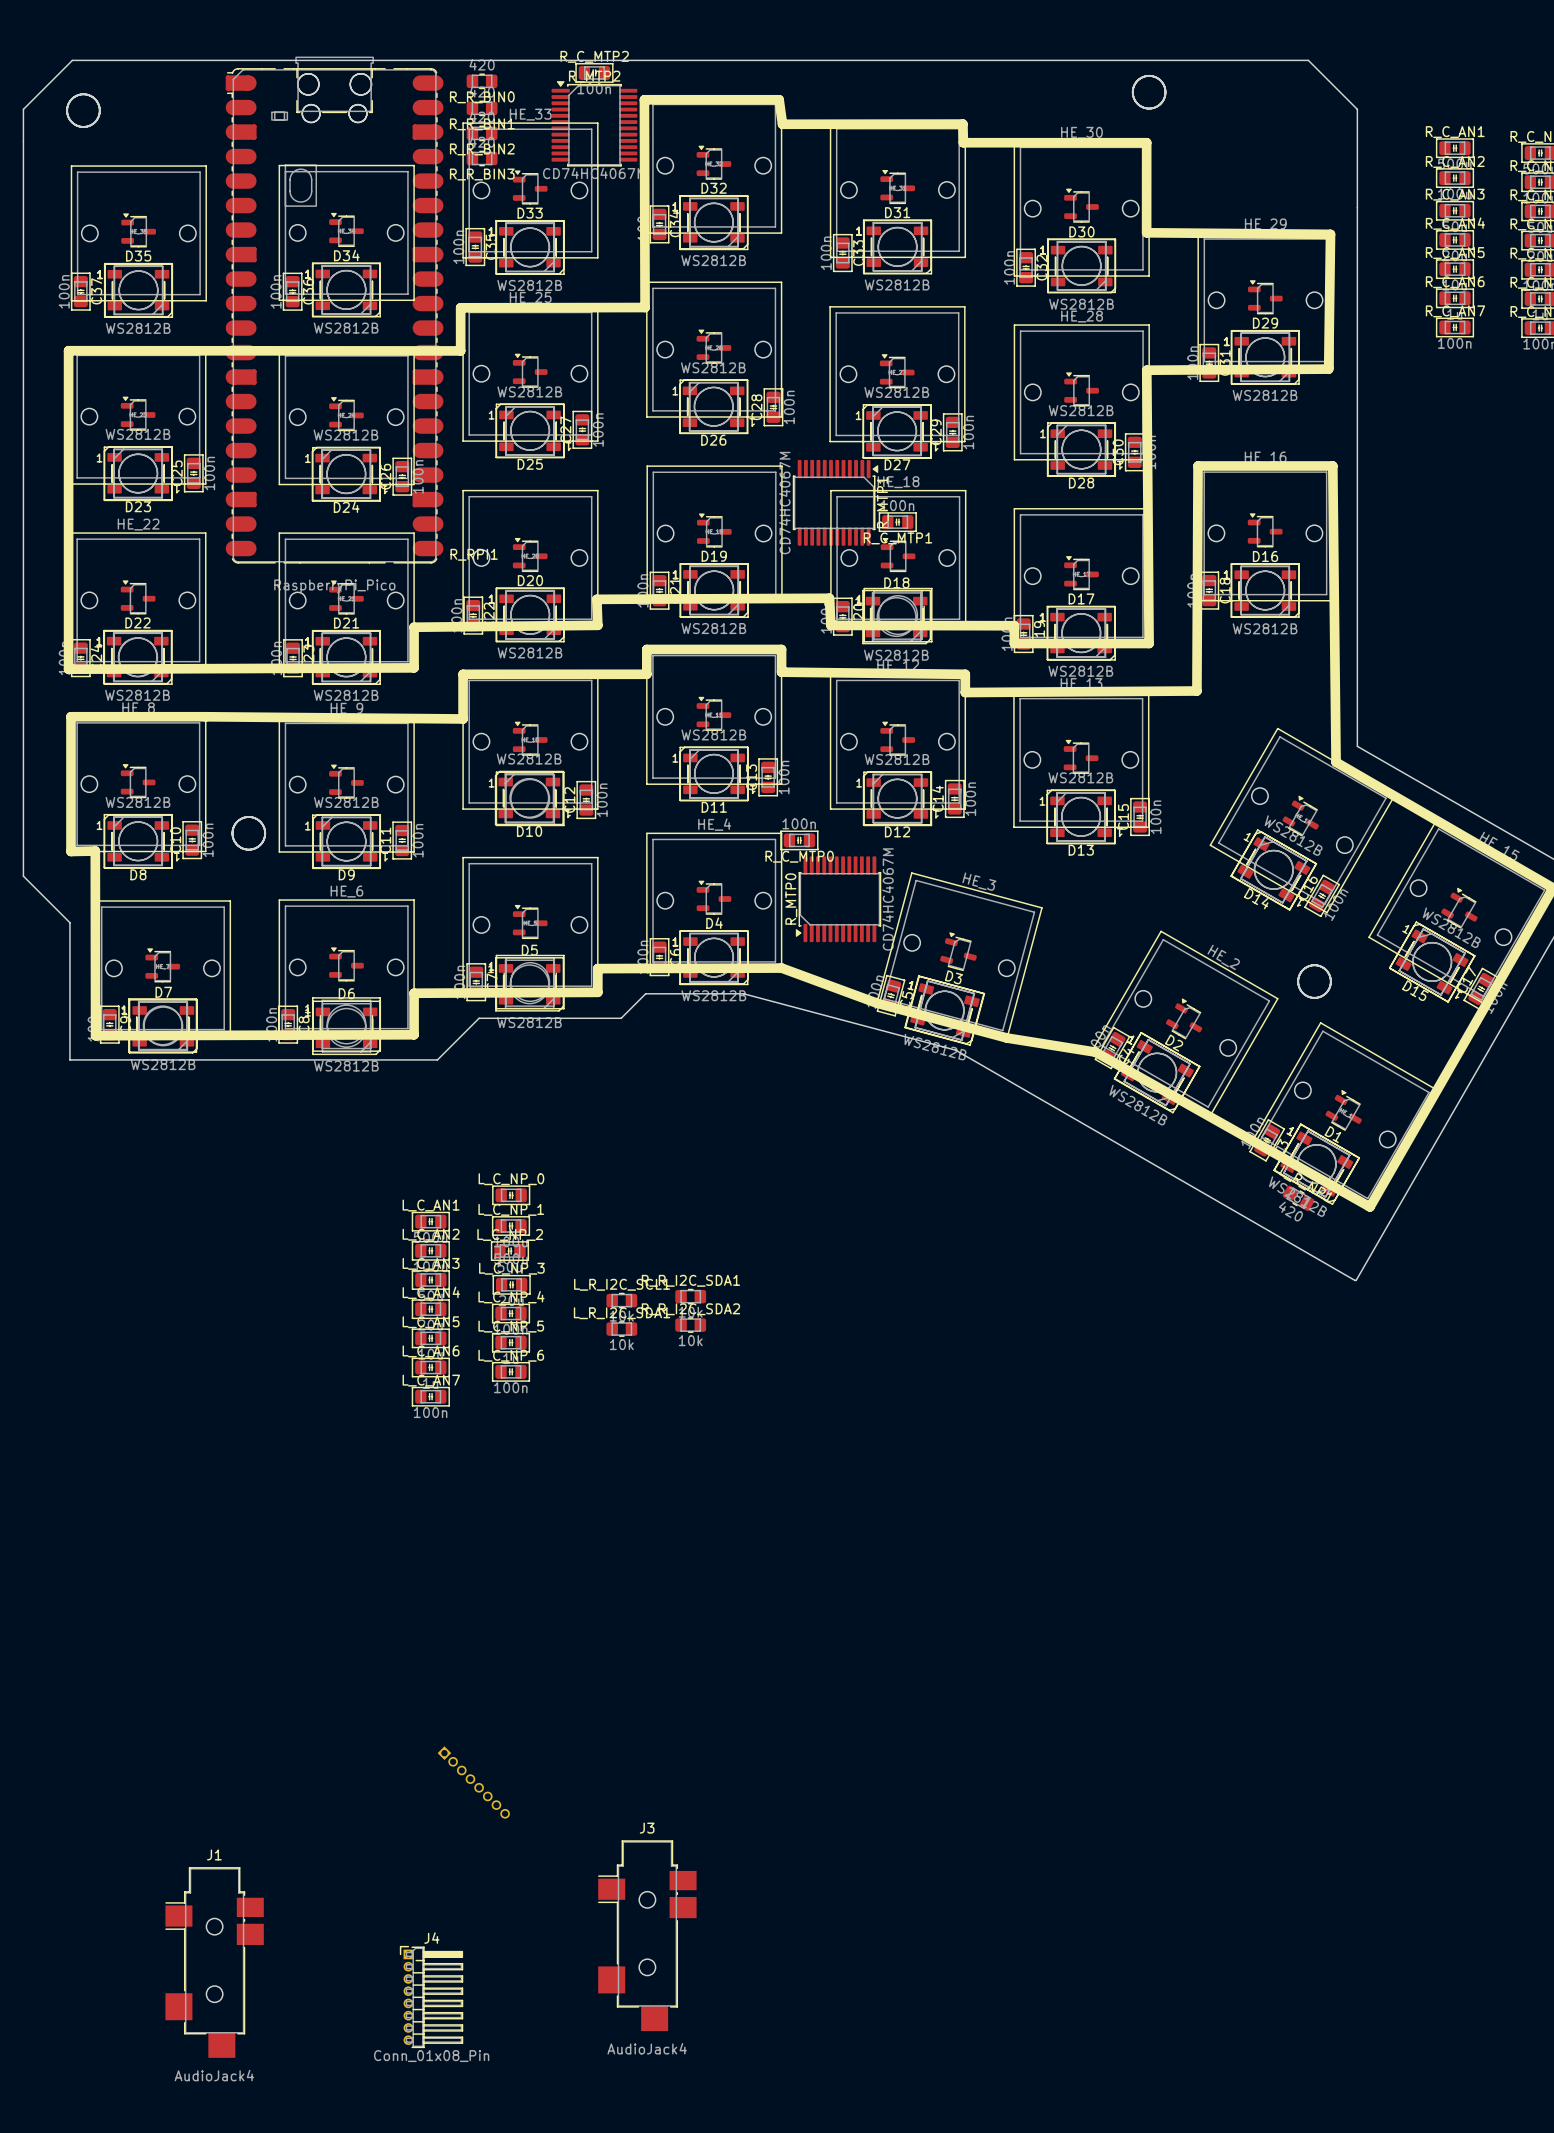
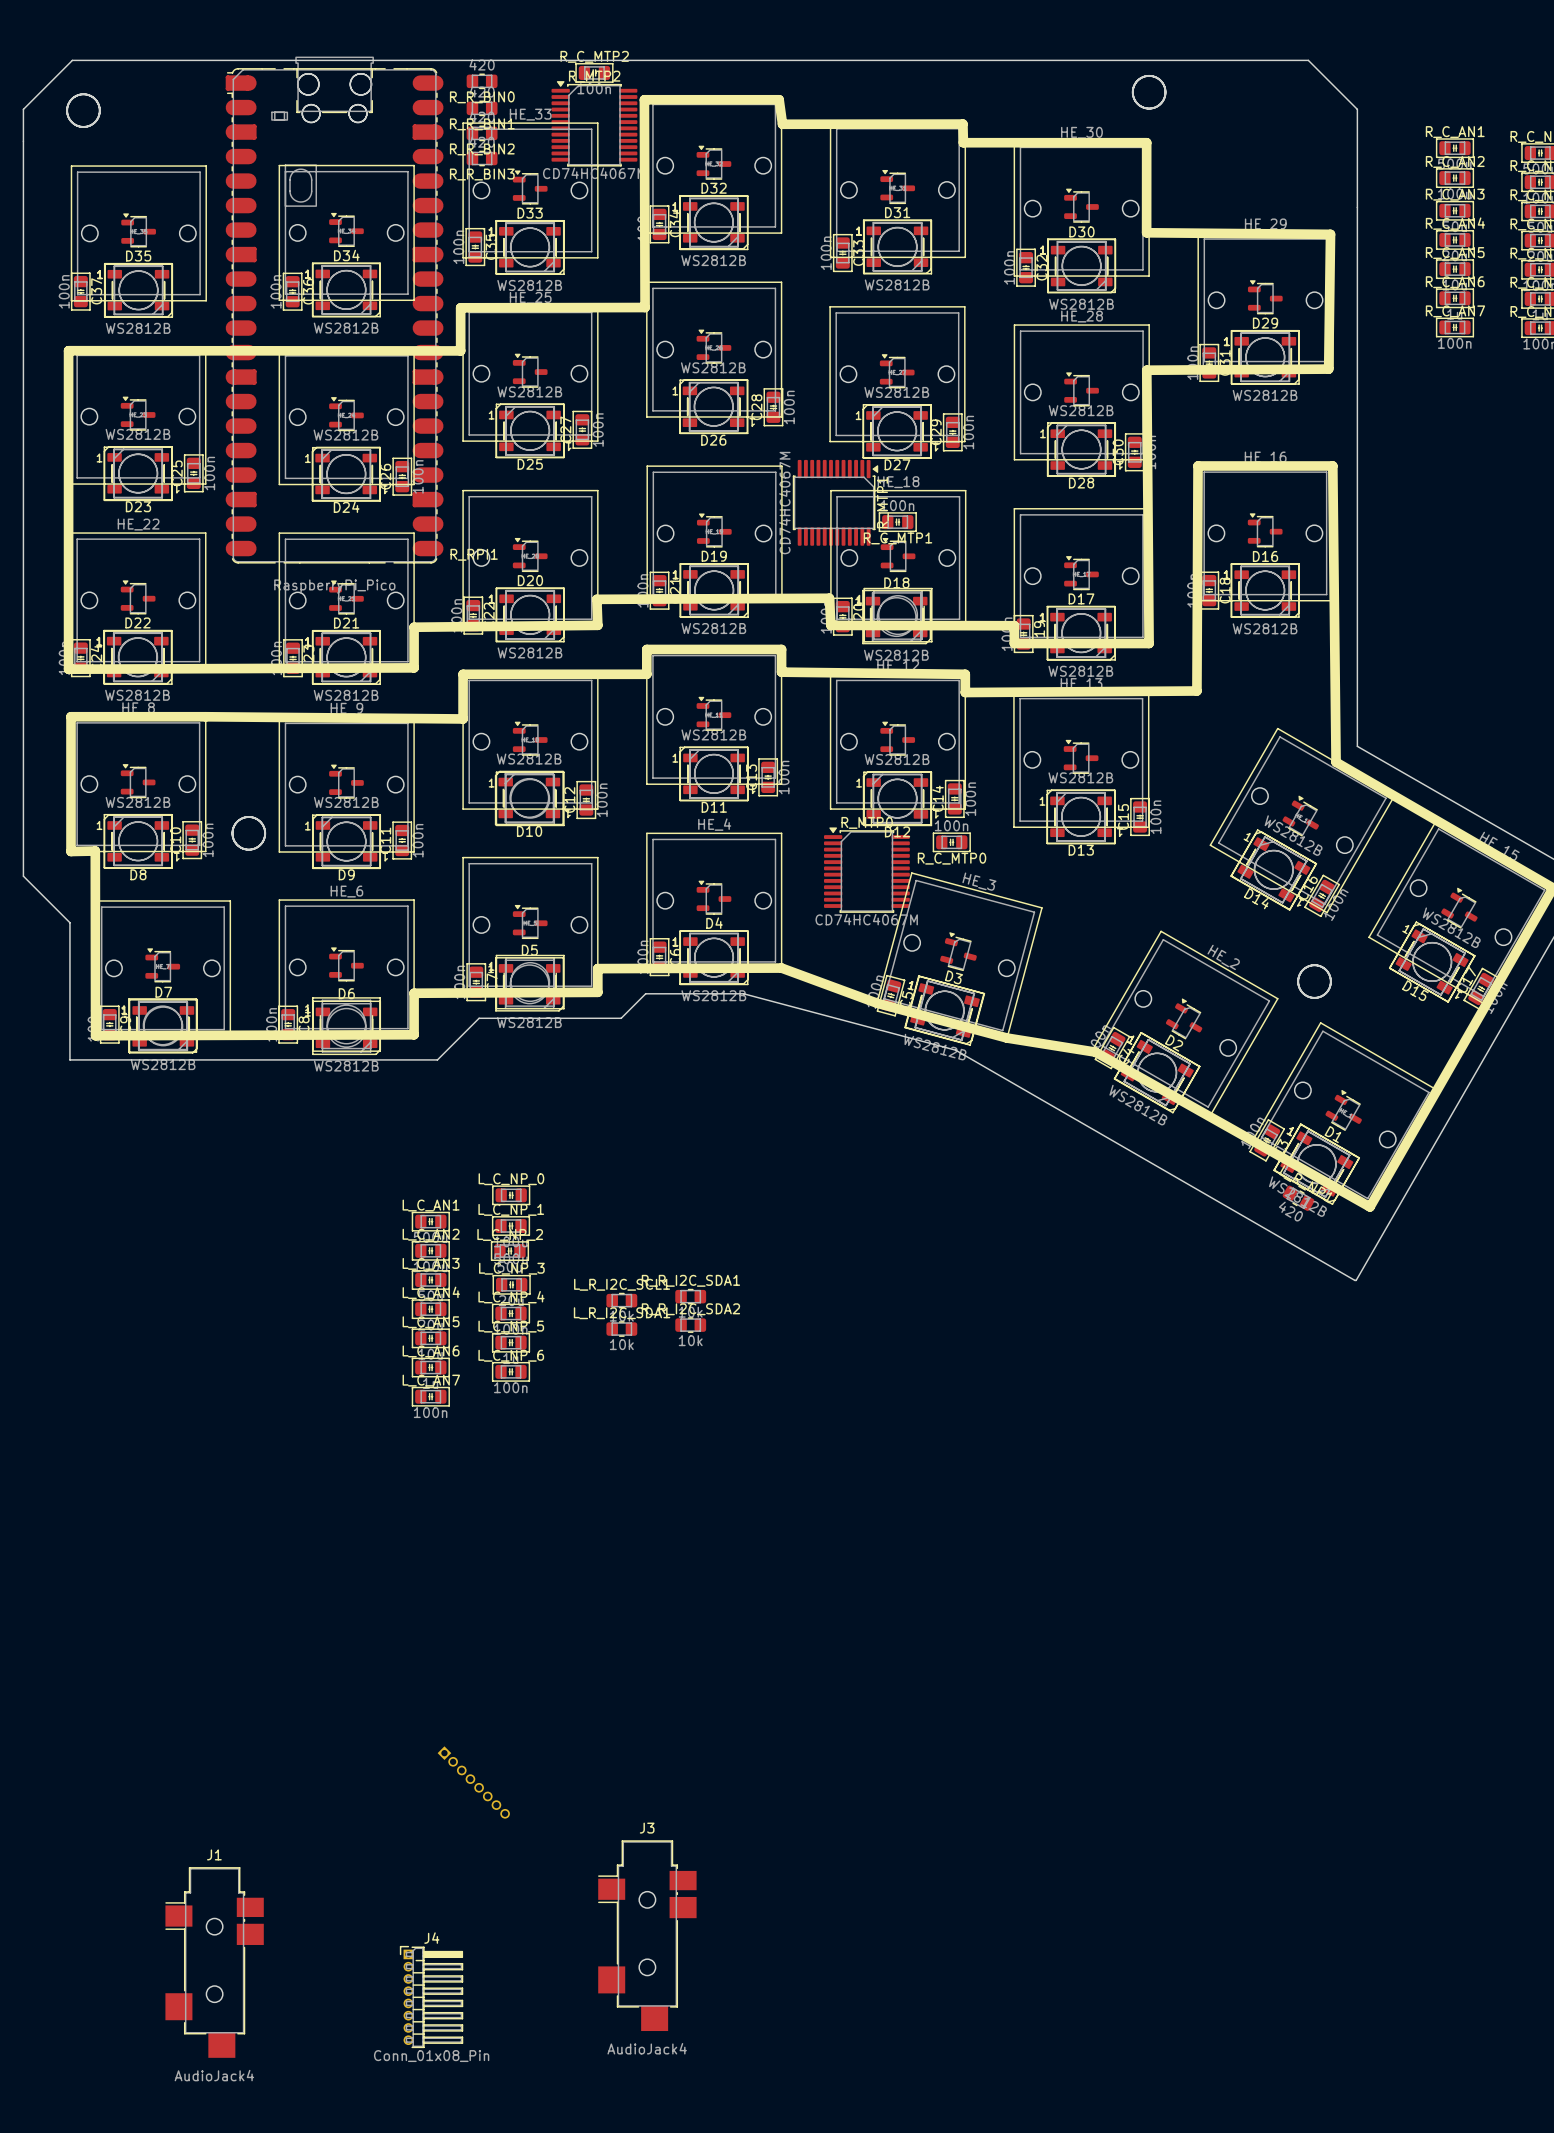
R_C_MTP0 position: (799, 840) -> (951, 842)
R_MTP0 rotation: 0° (838, 899) -> 90° clockwise (866, 870)

